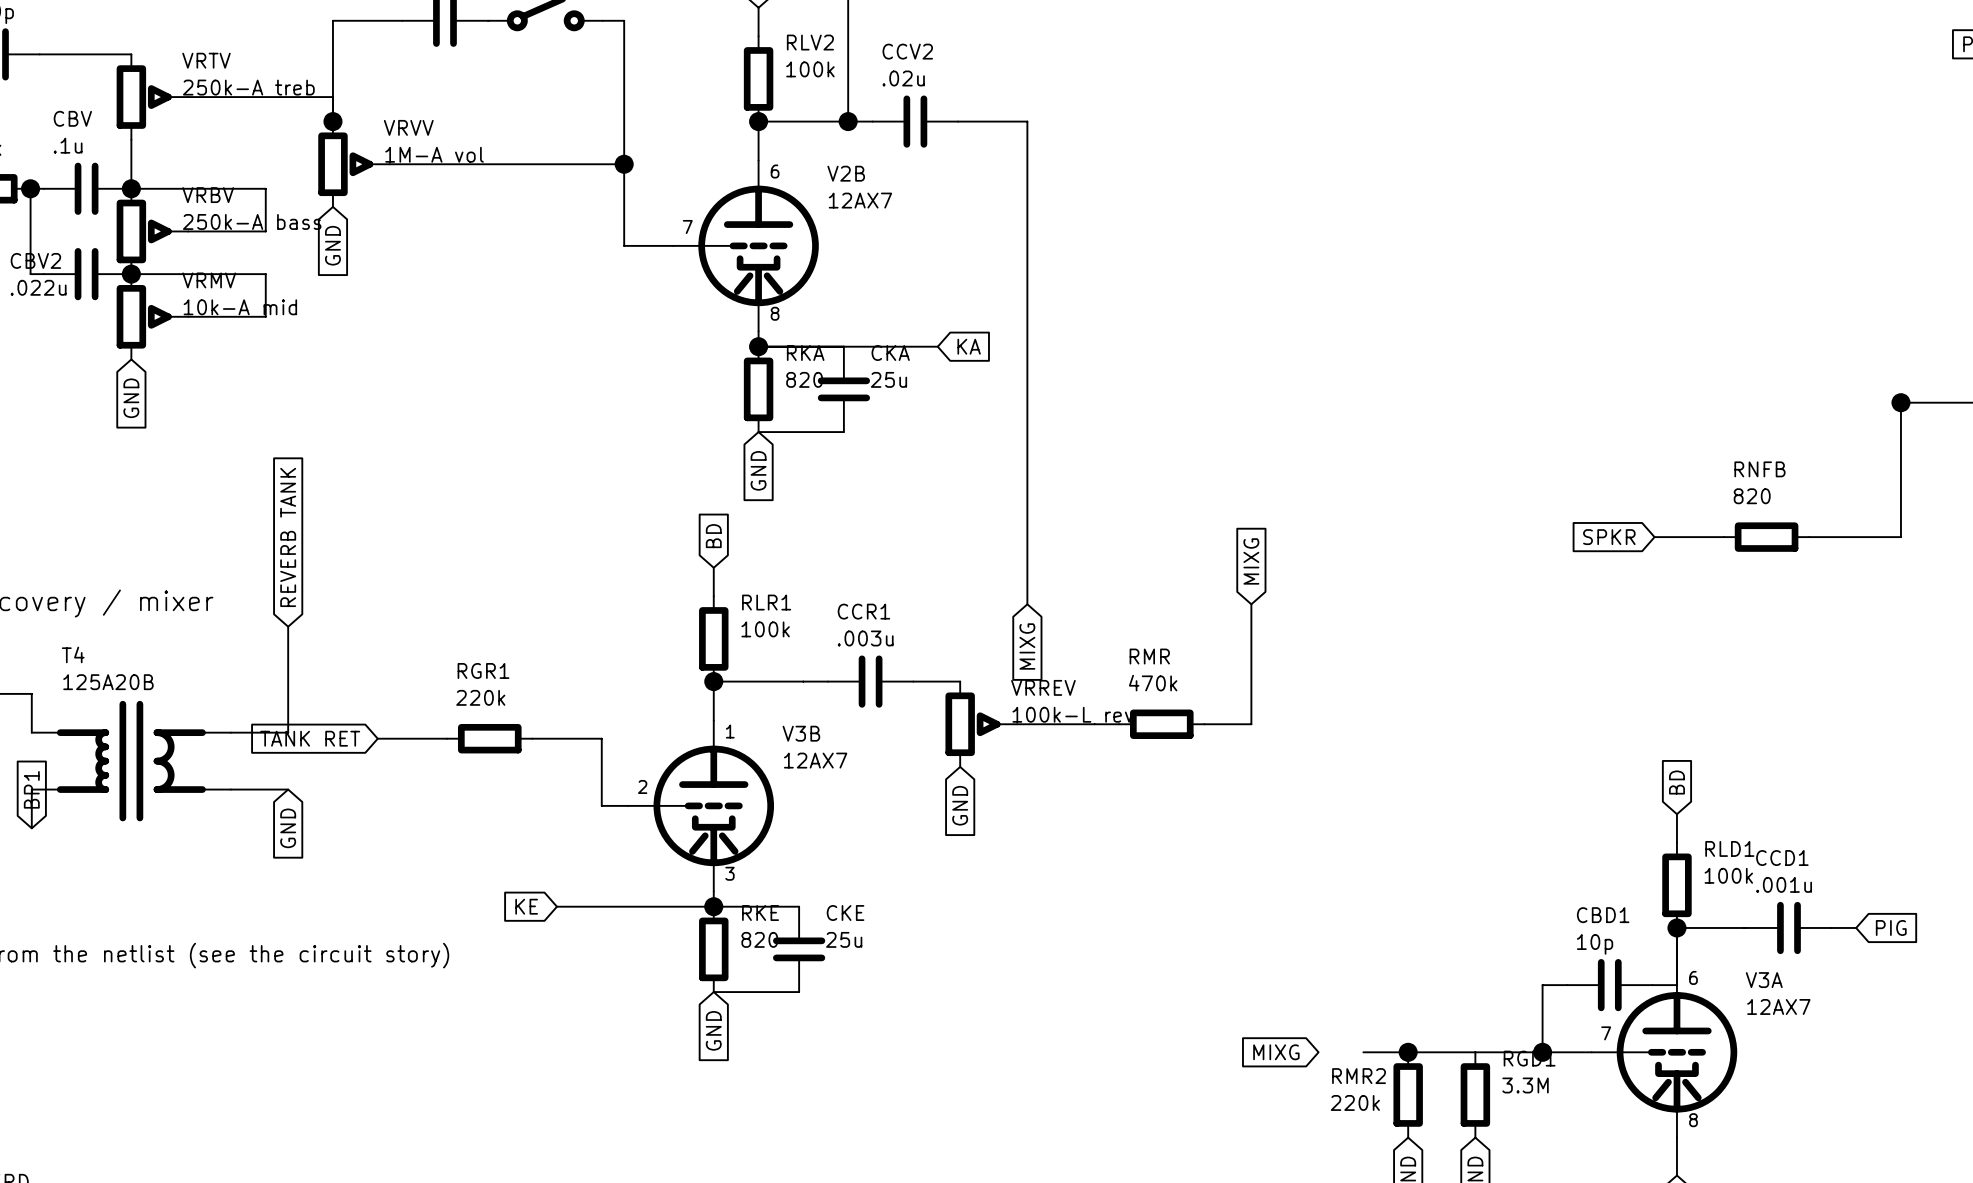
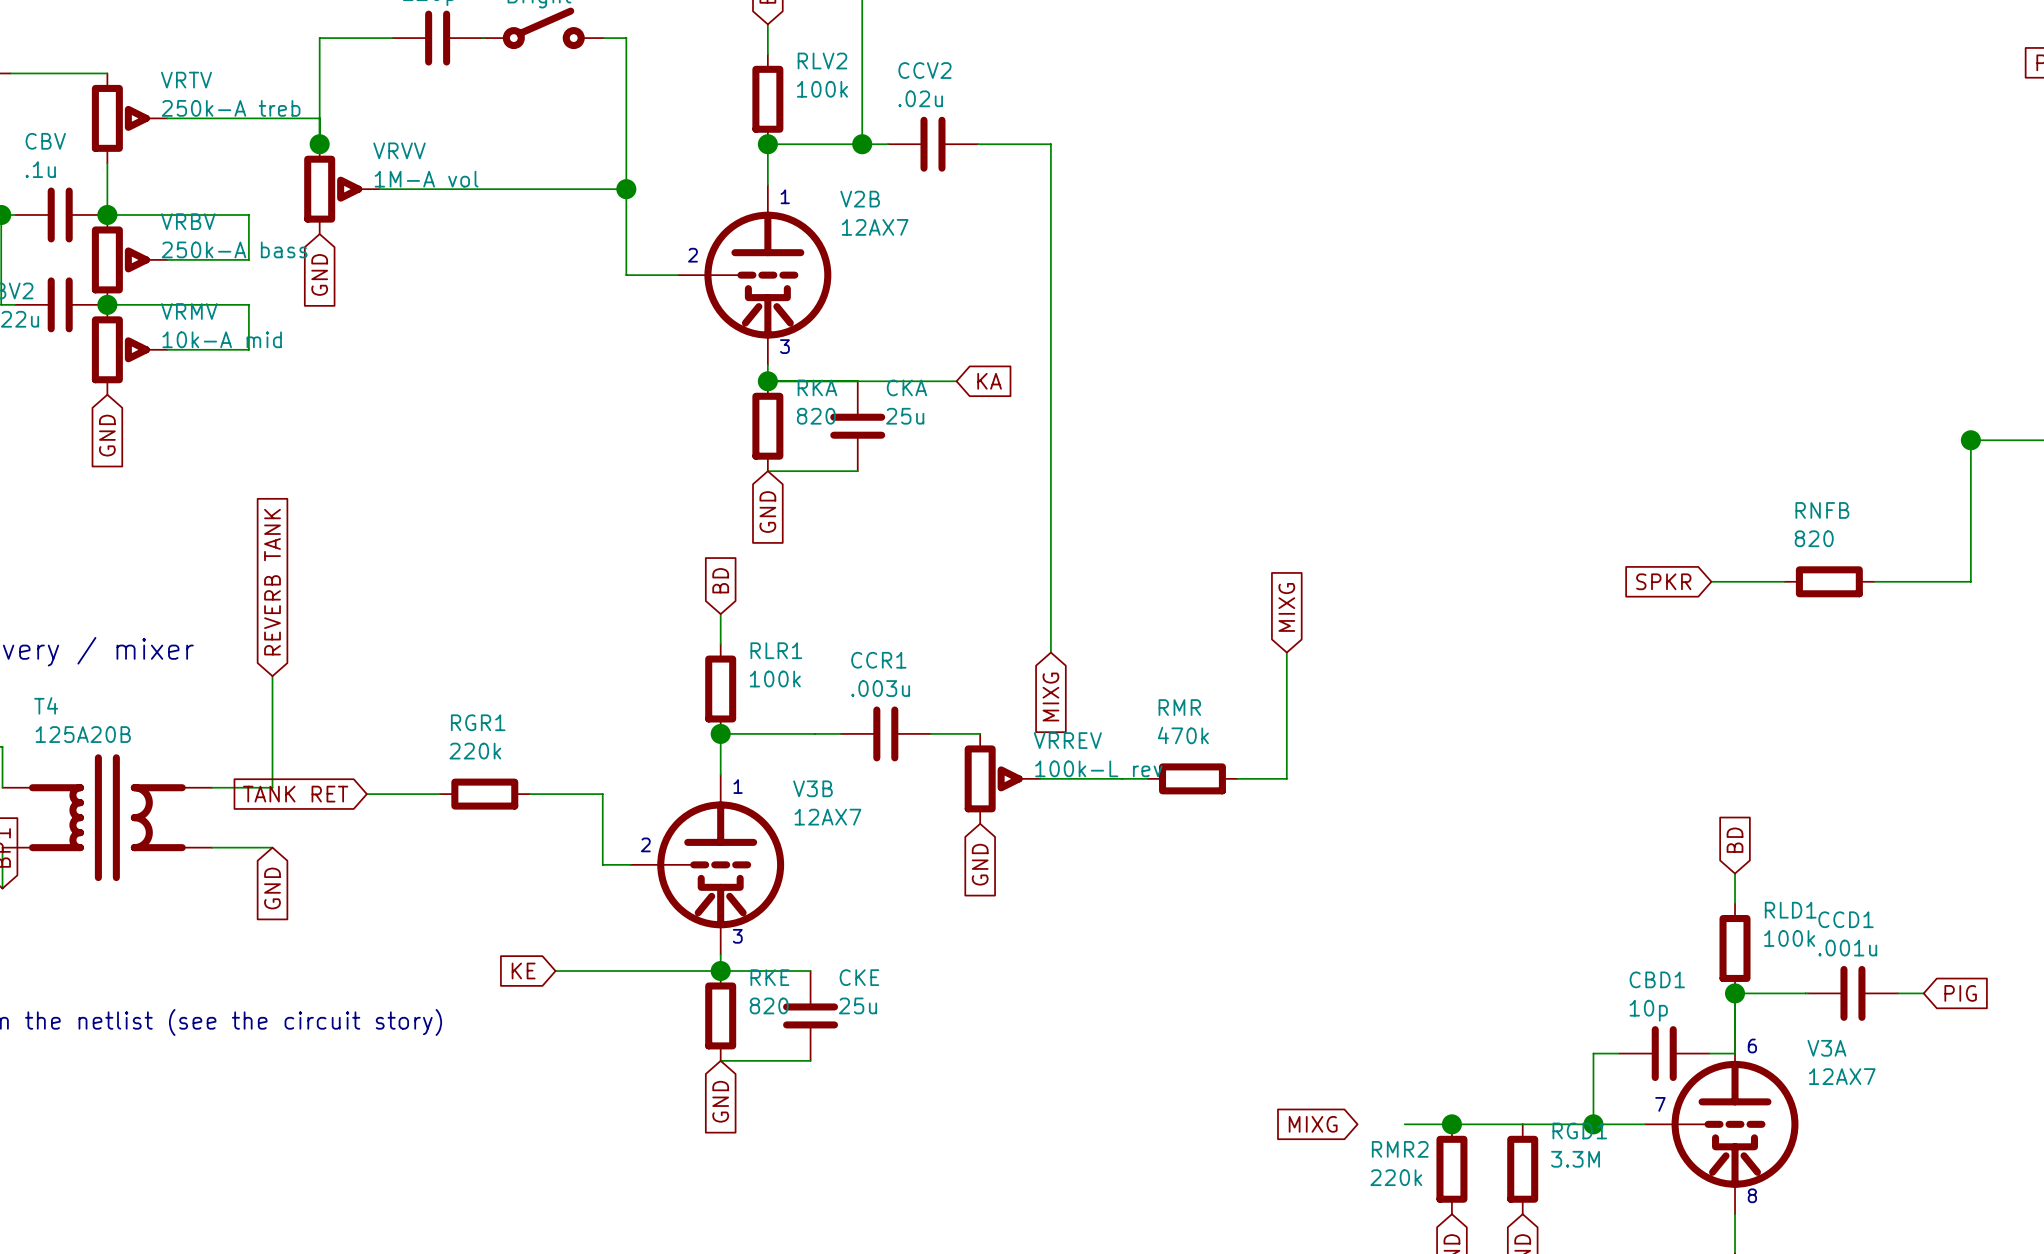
text: 6 (775, 171) -> 1 (785, 196)
text: 7 (687, 226) -> 2 (692, 255)
text: 8 (775, 313) -> 3 (784, 346)

